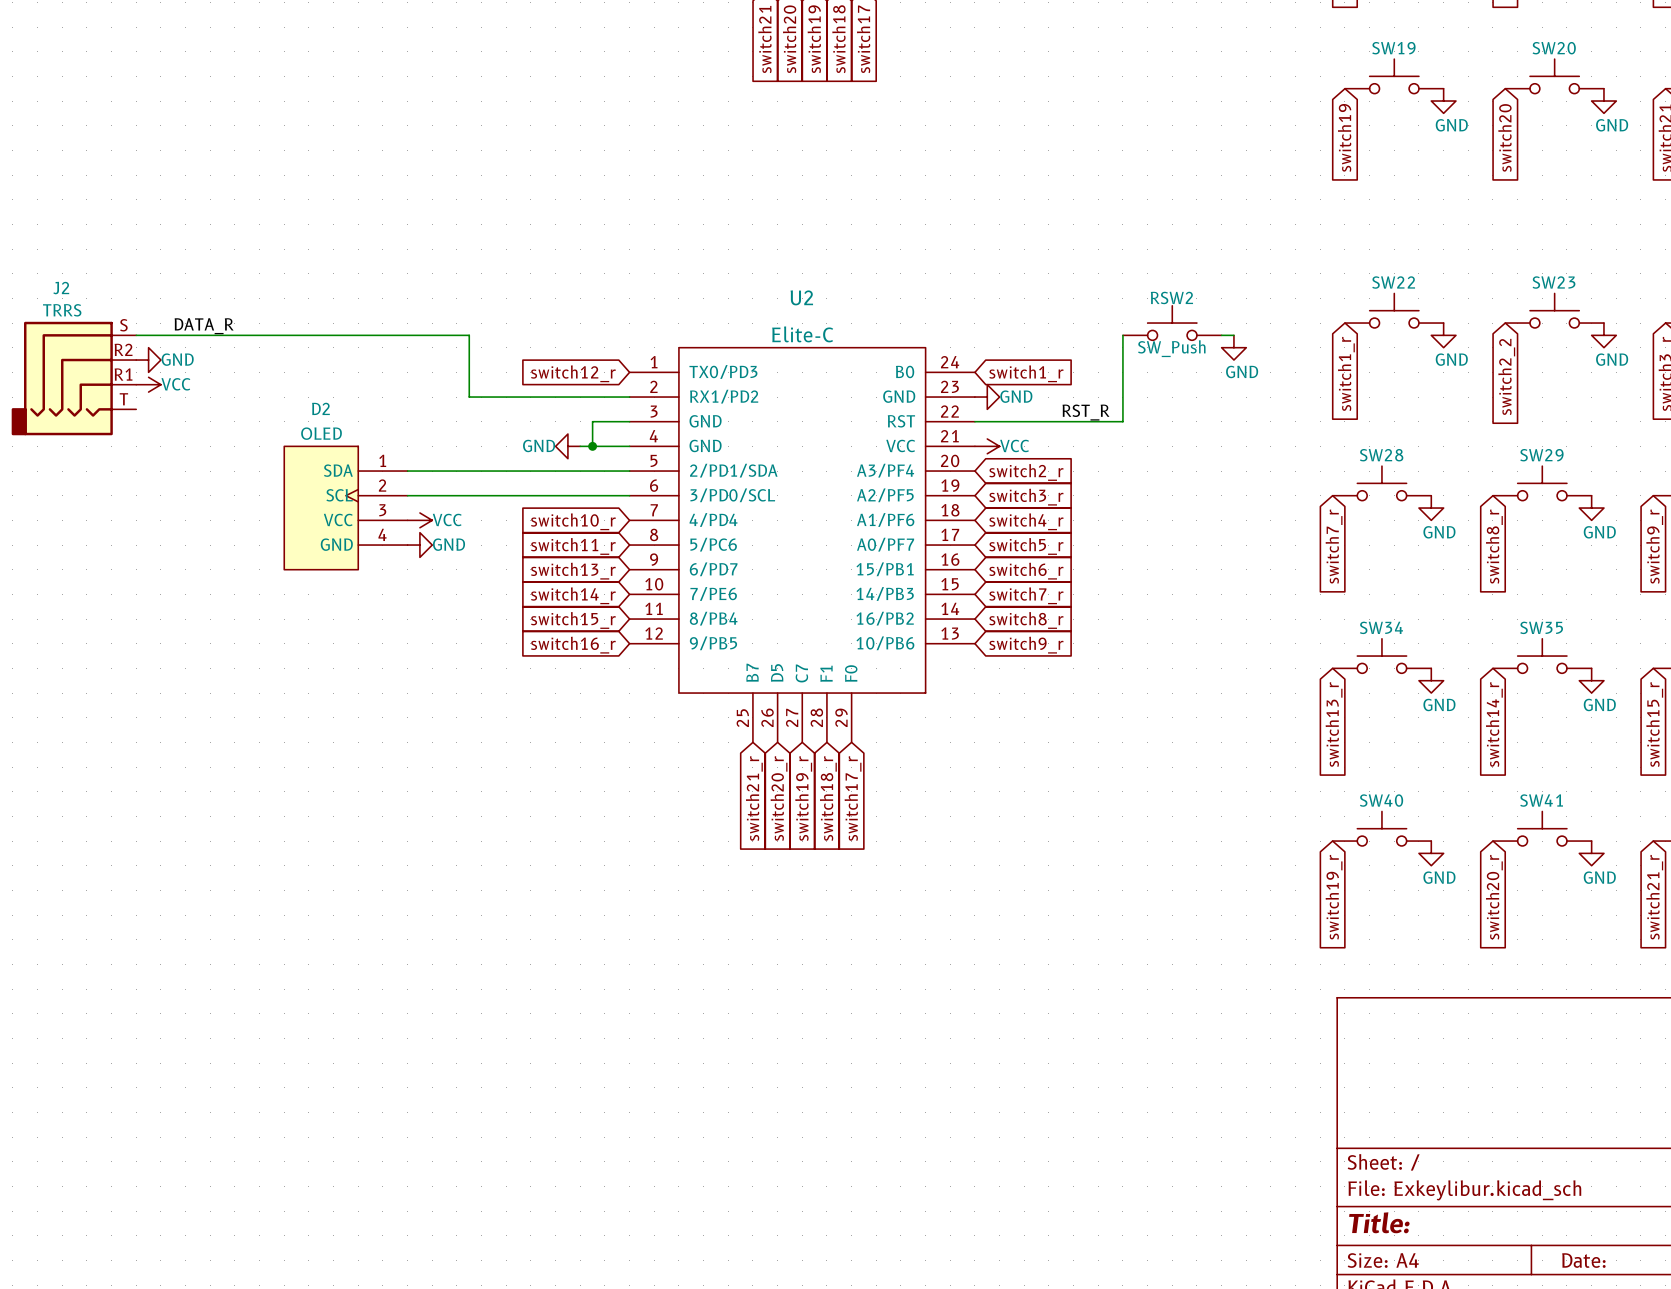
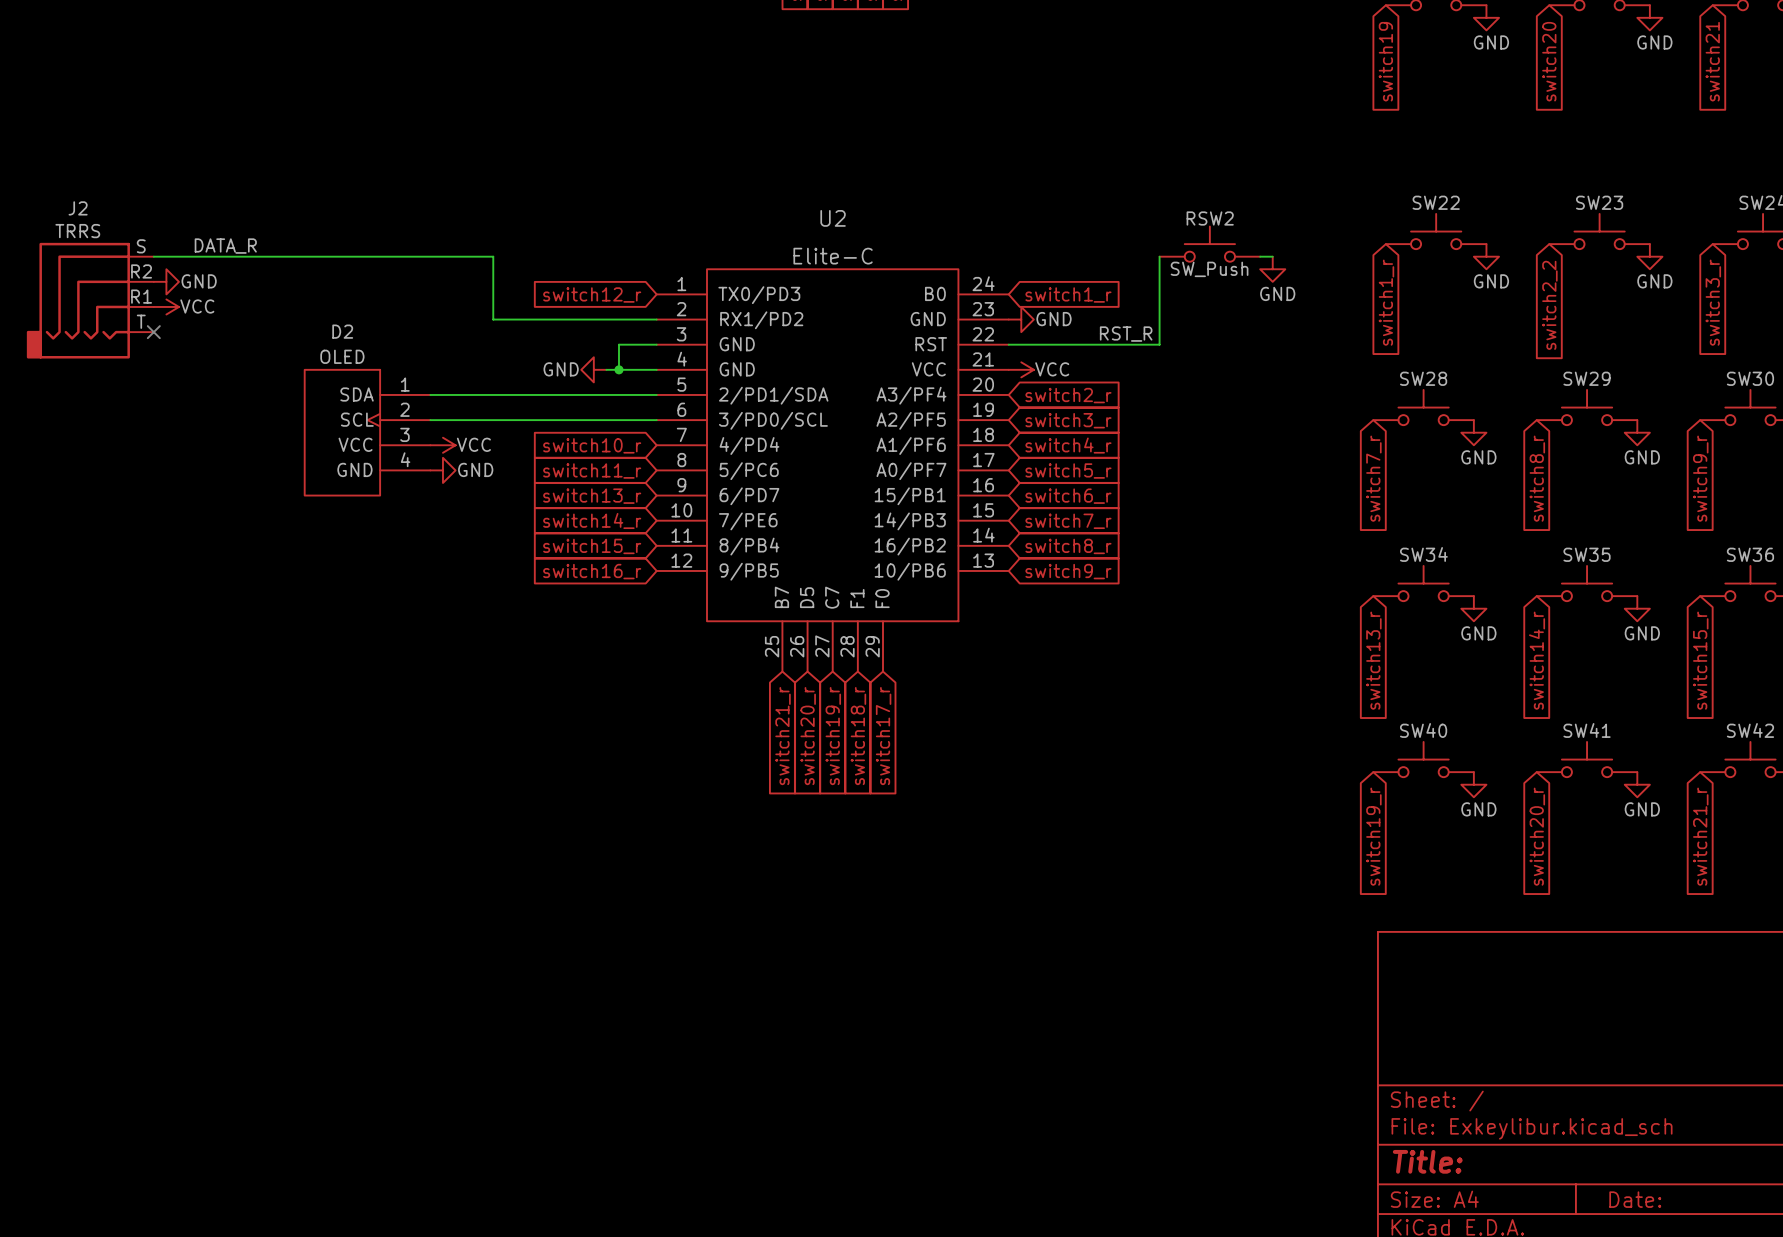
no-connect mark: none -> (153, 332)

